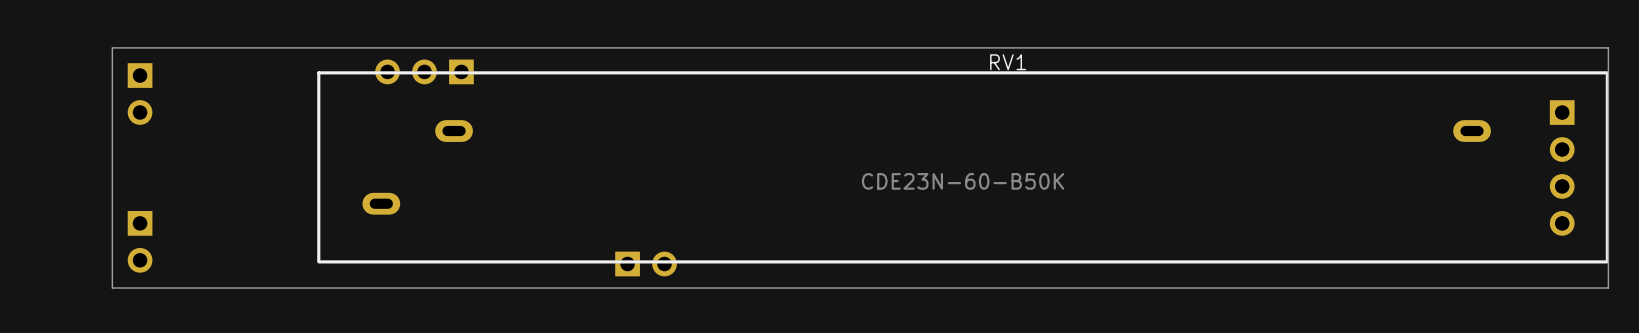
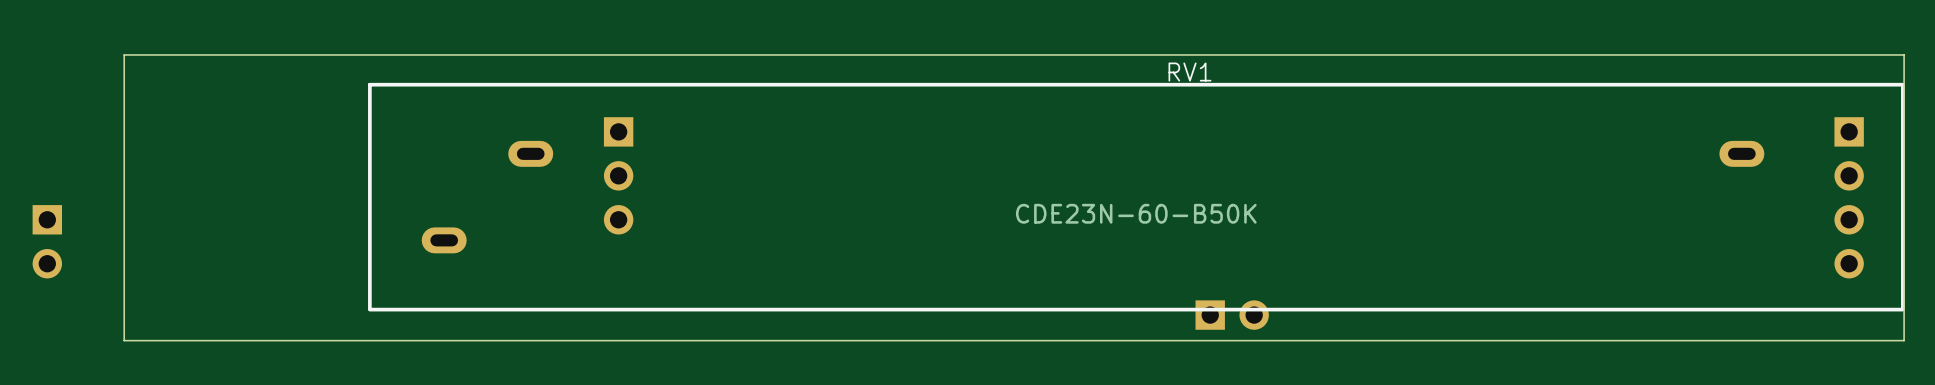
part rotation: 0° (424, 71) -> 90° counterclockwise (618, 175)
part position: (424, 71) -> (618, 175)
part: (140, 94) -> none
part: none -> (47, 241)
part: (140, 241) -> none
part: (646, 264) -> none
part: none -> (1232, 315)

